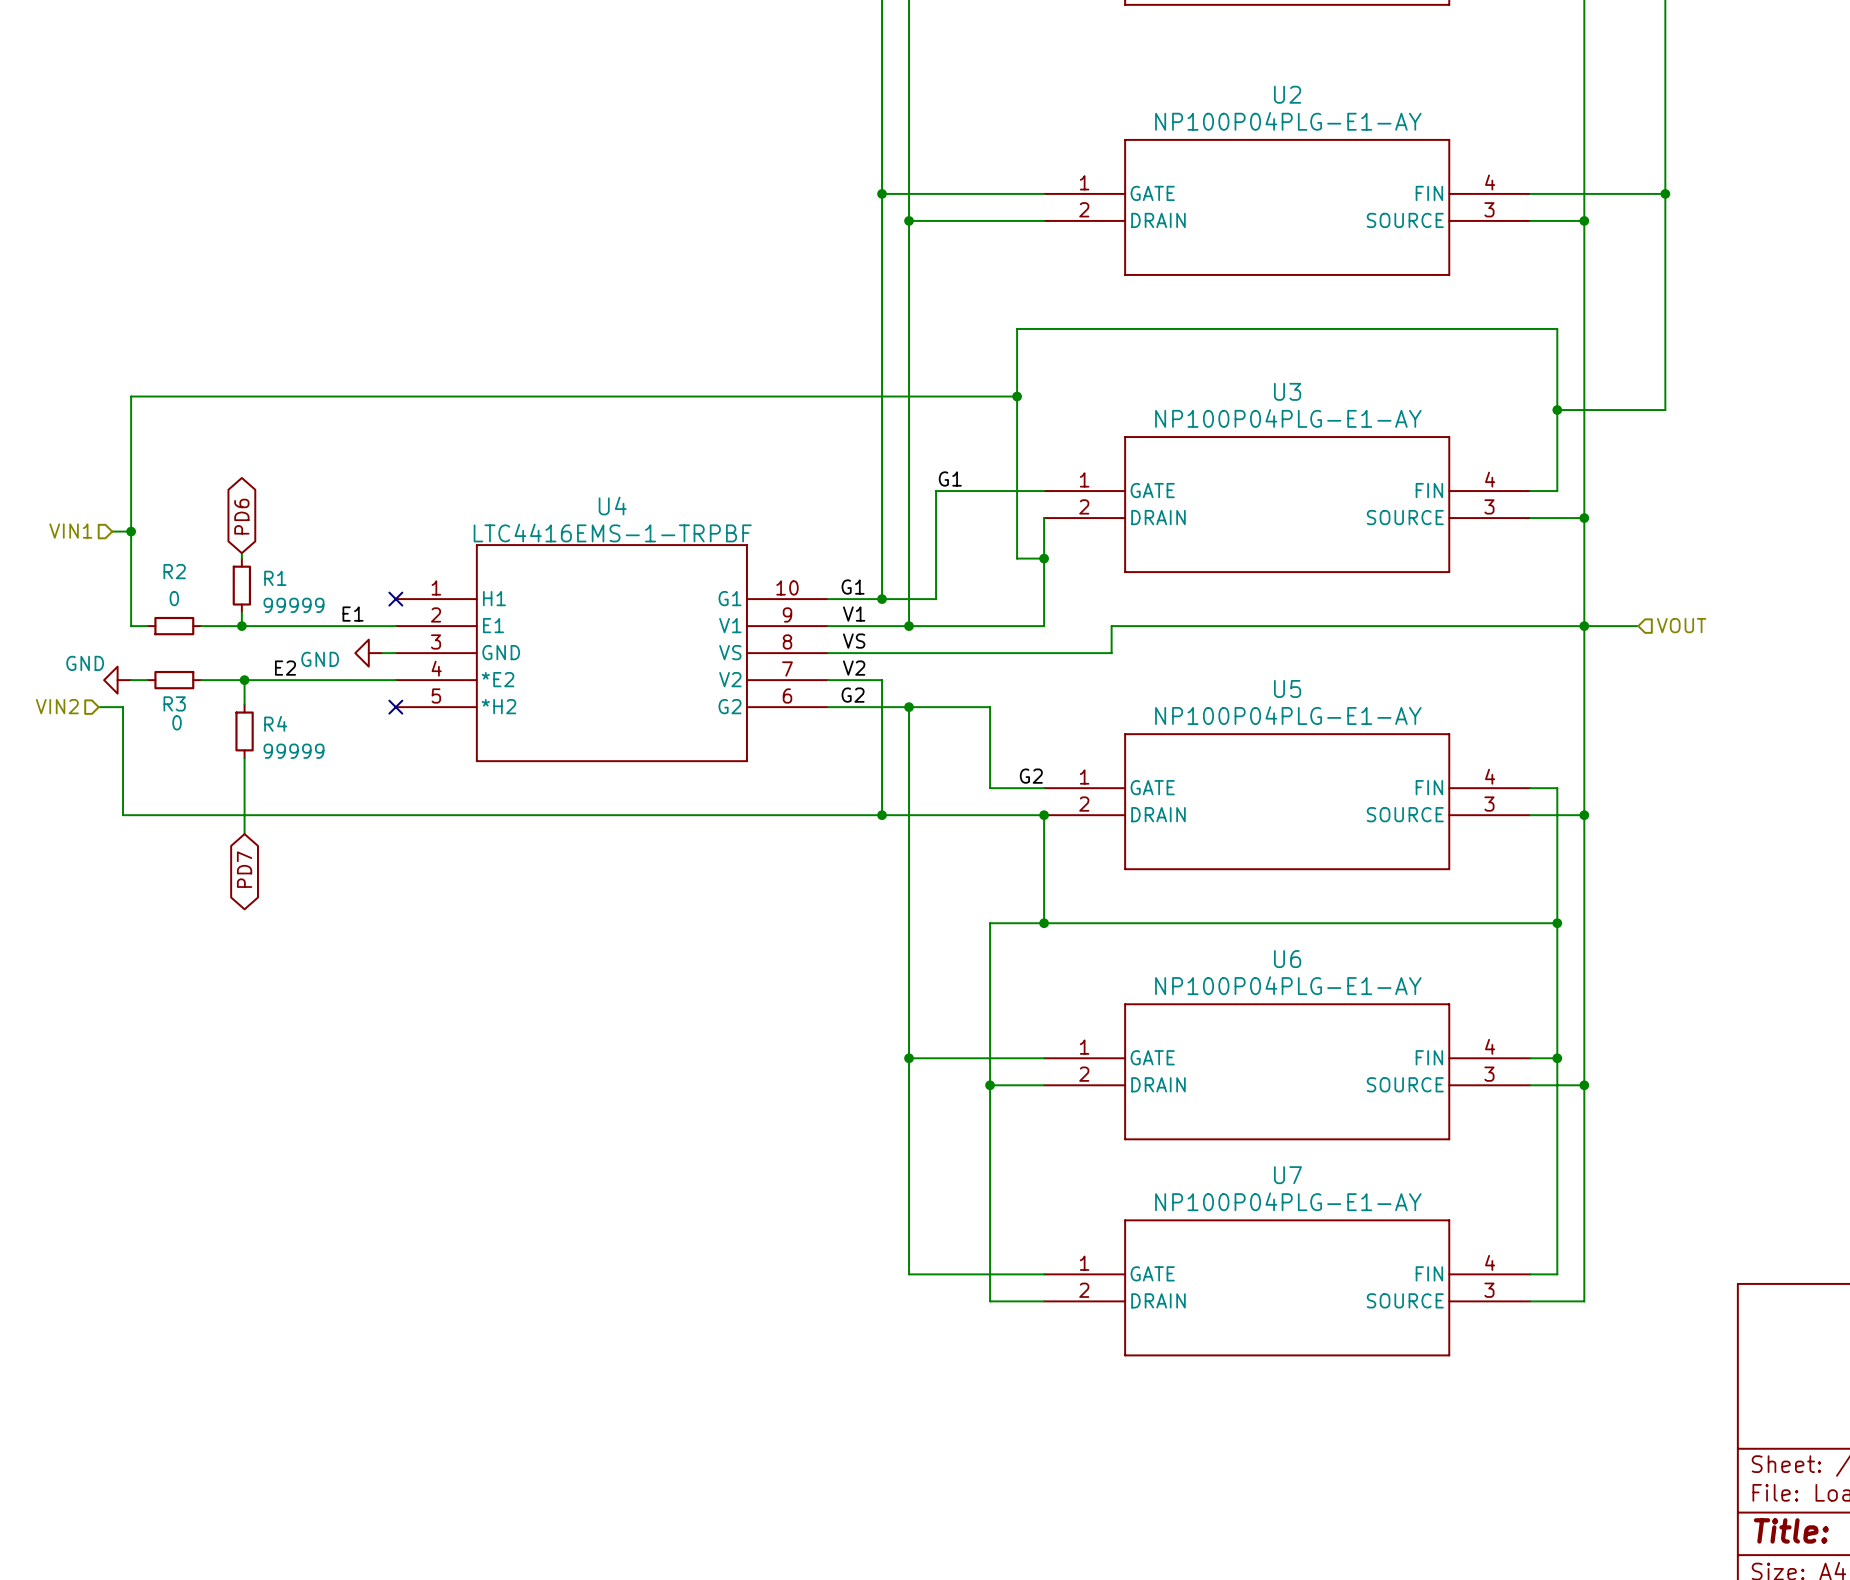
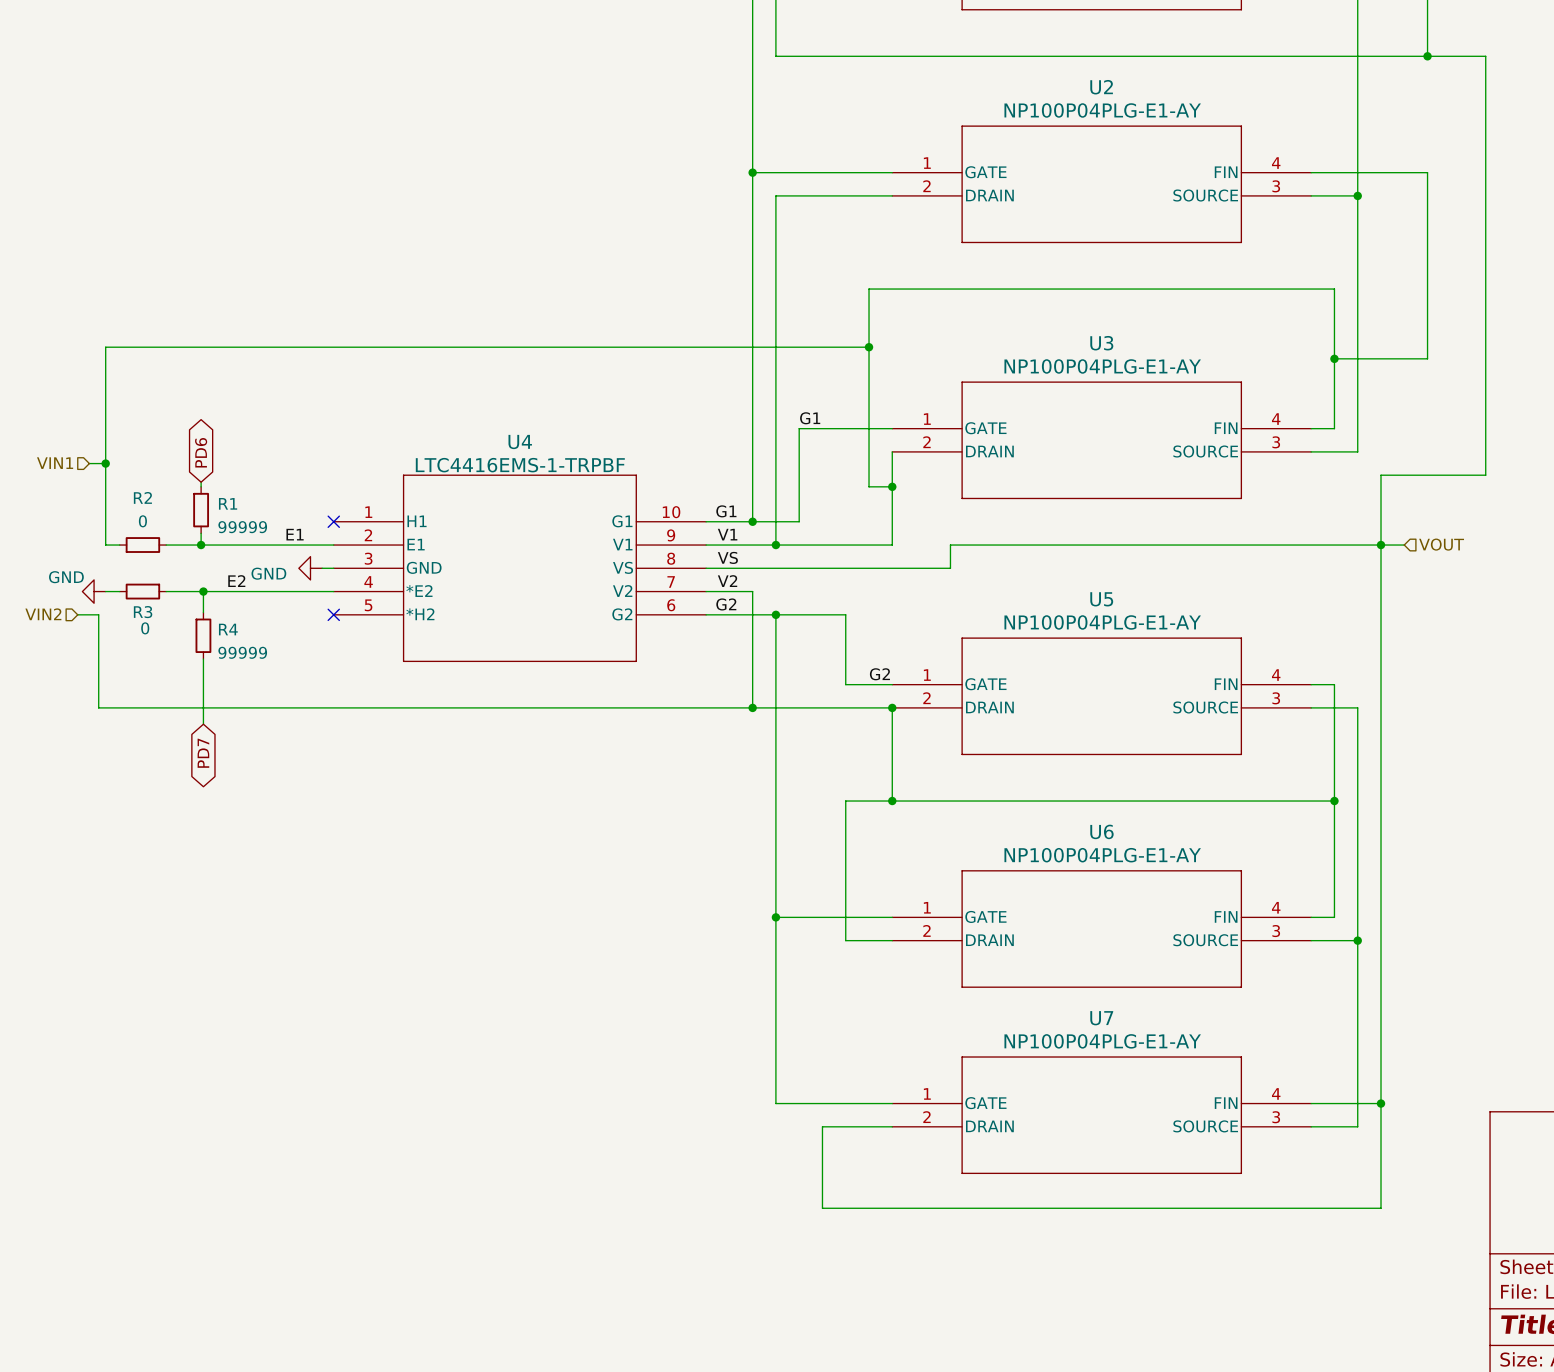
wire: (909, 58) (909, 220) -> none
wire: (1665, 58) (1665, 193) -> none
junction: none -> (1427, 56)
junction: (1665, 193) -> none
junction: (909, 220) -> none
wire: (1584, 518) (1584, 815) -> none
junction: (1584, 518) -> none
junction position: (1584, 626) -> (1381, 545)
junction: (1584, 815) -> none
wire: (1557, 1058) (1557, 1274) -> (1381, 1103) (1334, 1103)
junction: (1557, 1058) -> none
wire: (990, 1085) (990, 1301) -> (775, 56) (1485, 56) (1485, 475) (1381, 475) (1381, 1208) (822, 1208) (822, 1126) (845, 1126)
junction: (990, 1085) -> none
junction: none -> (1381, 1103)

